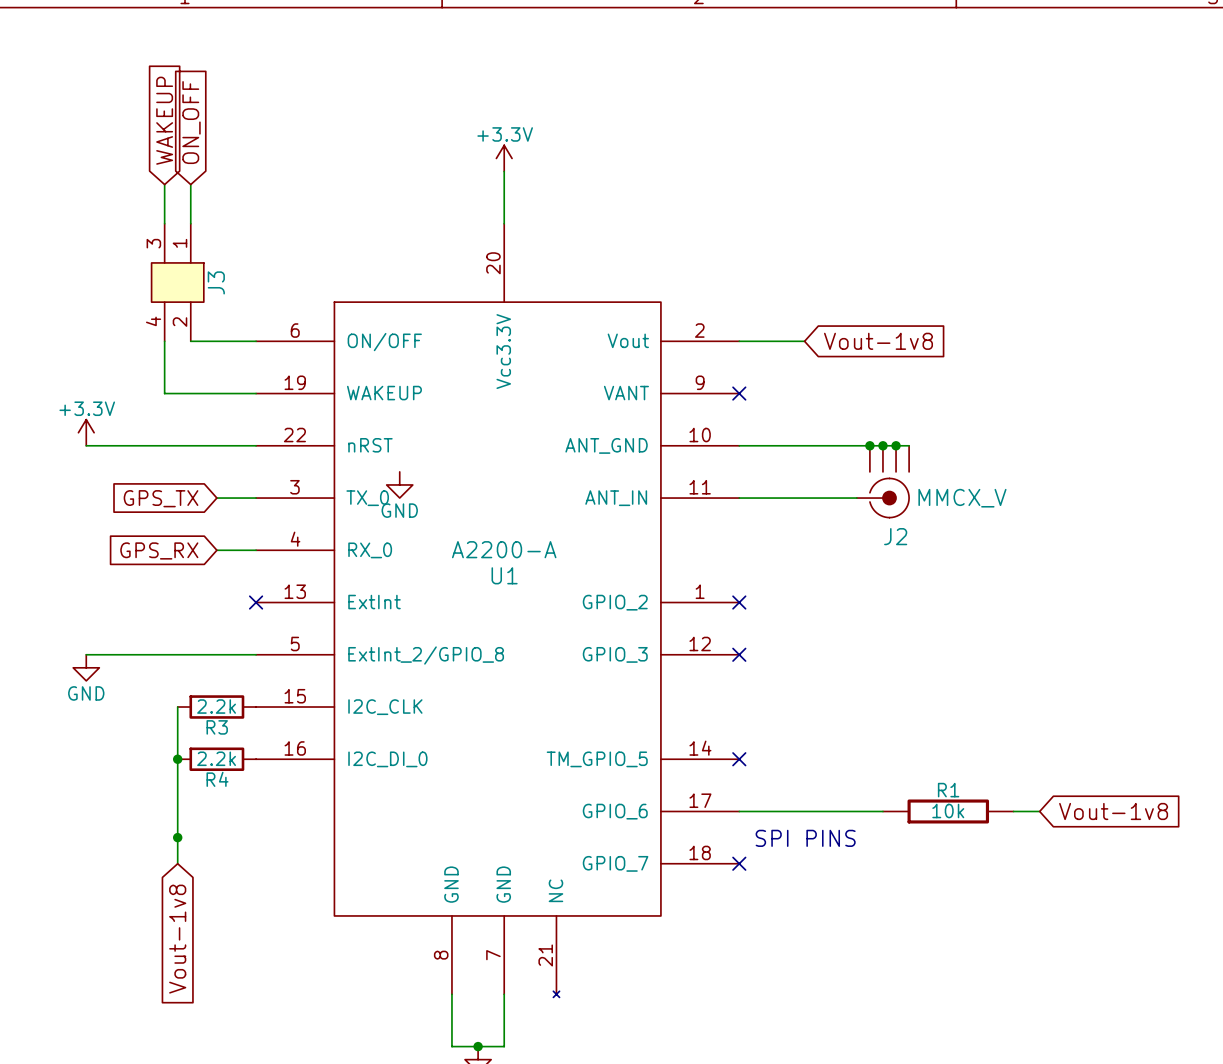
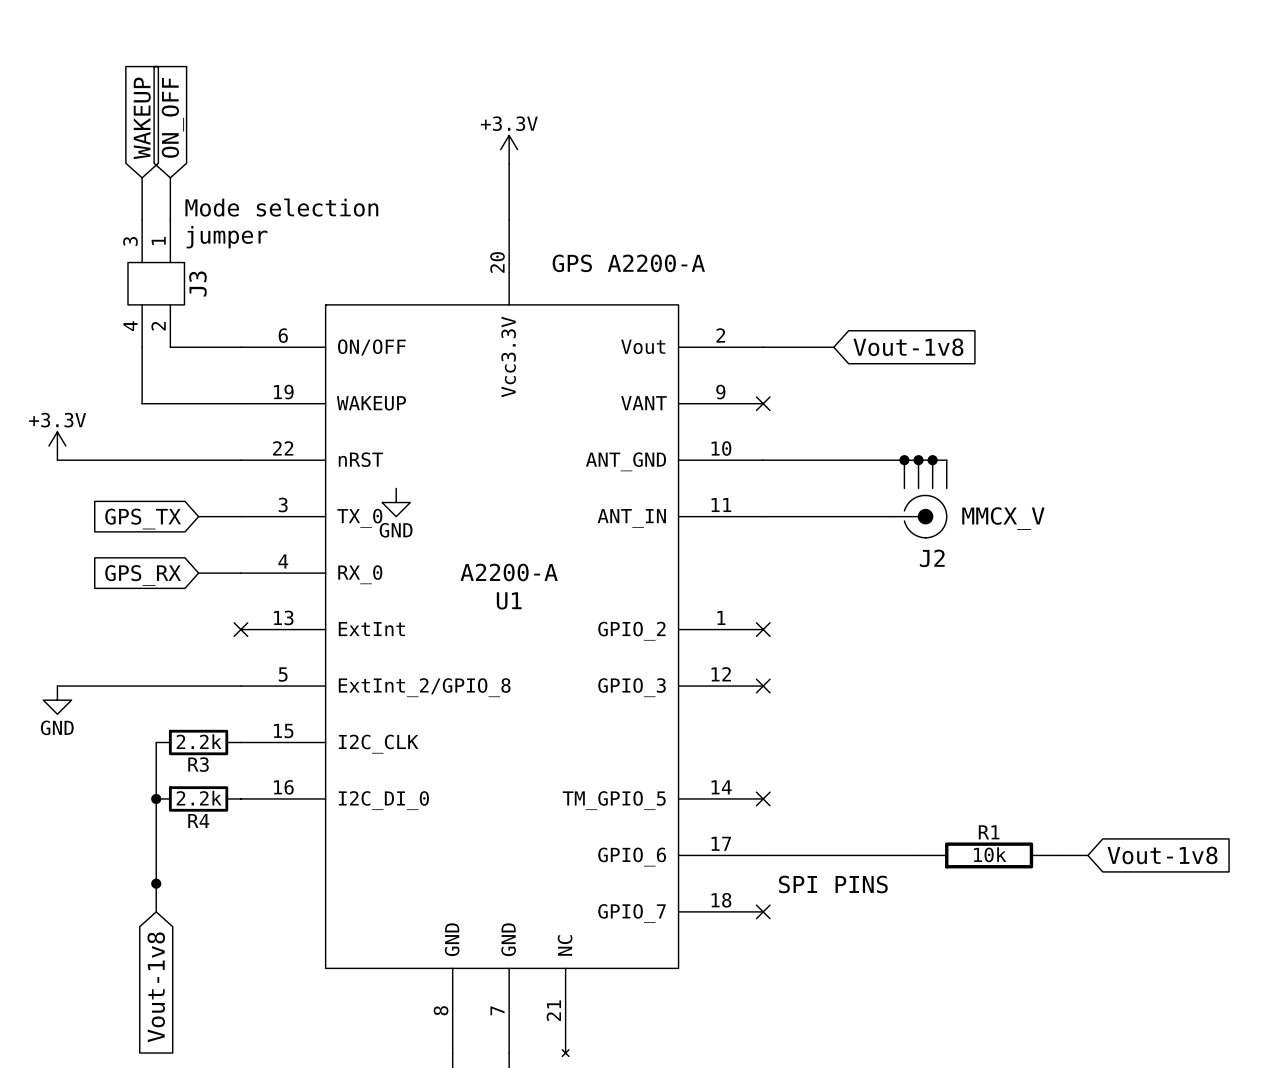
text: none -> Mode selection (281, 207)
text: none -> jumper (227, 237)
text: none -> GPS A2200-A (628, 263)

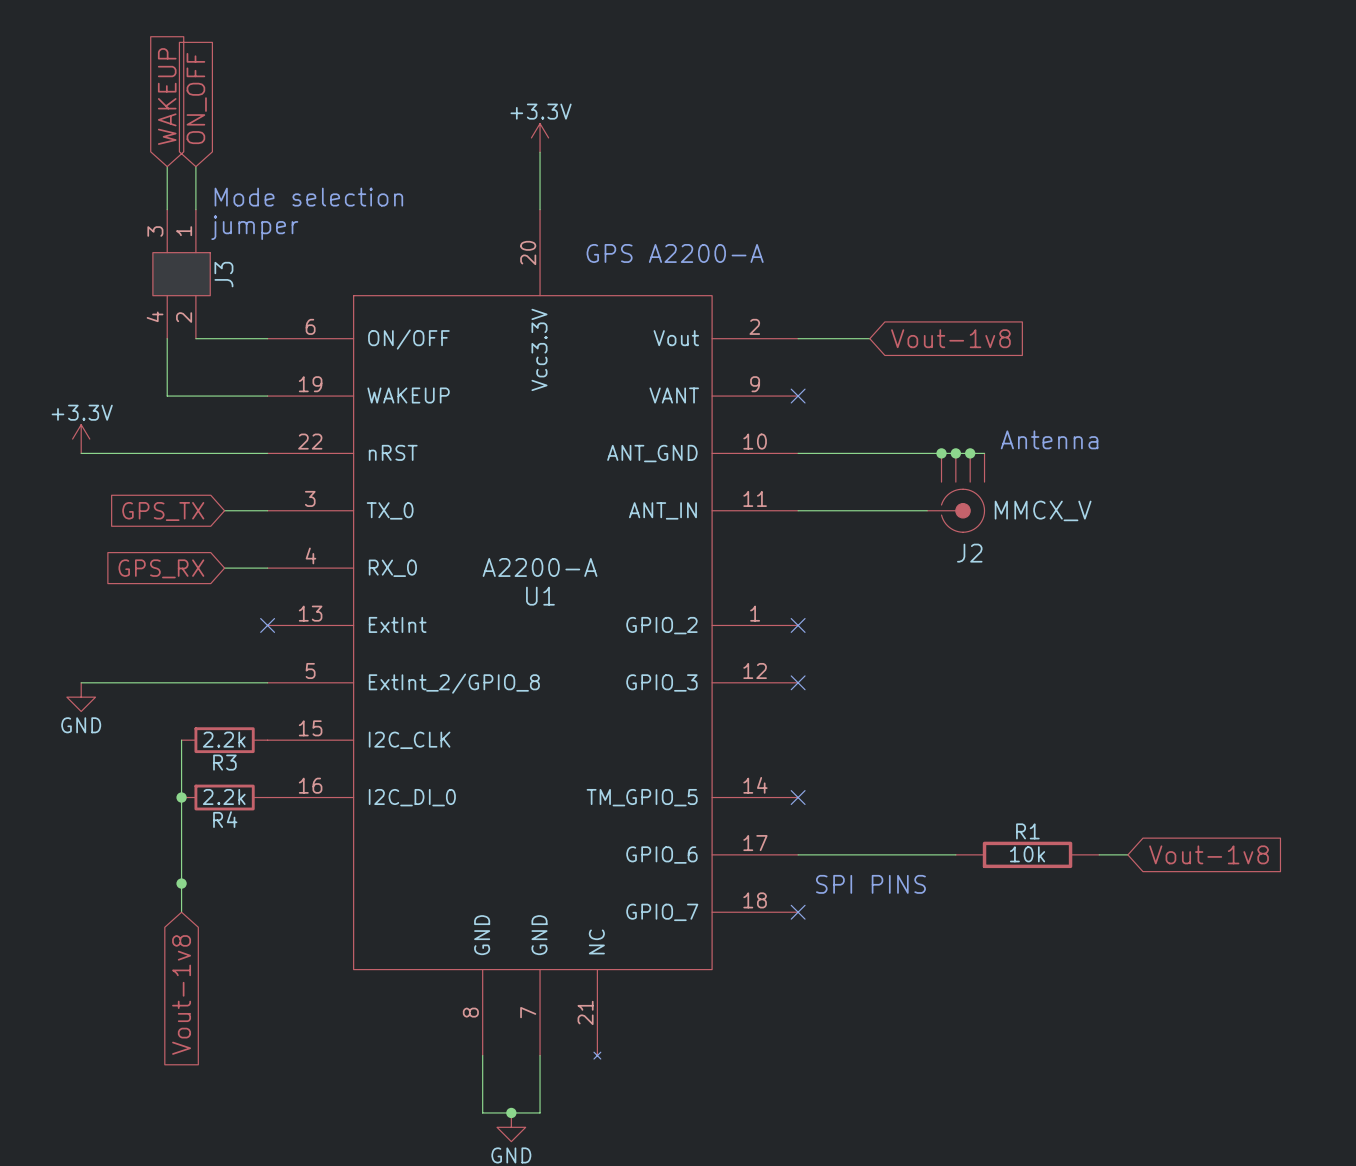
text: none -> Antenna (1049, 439)
power symbol: GND (396, 502) -> none

